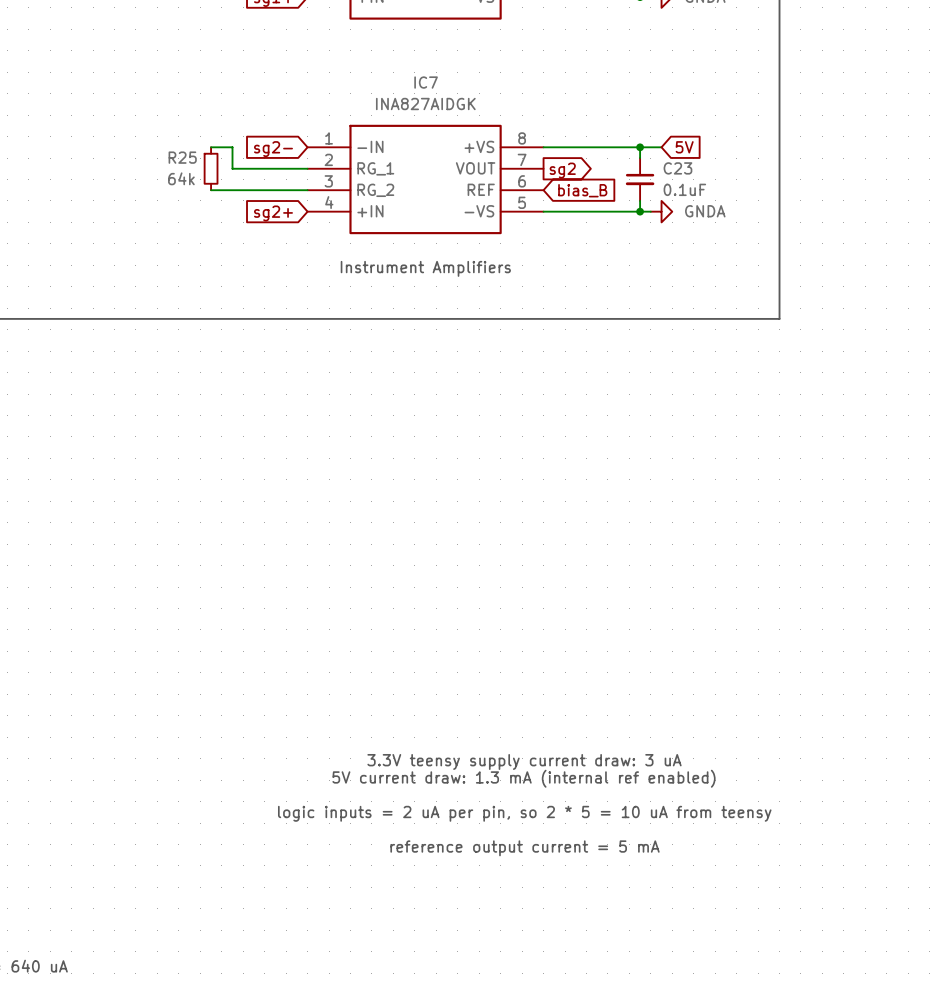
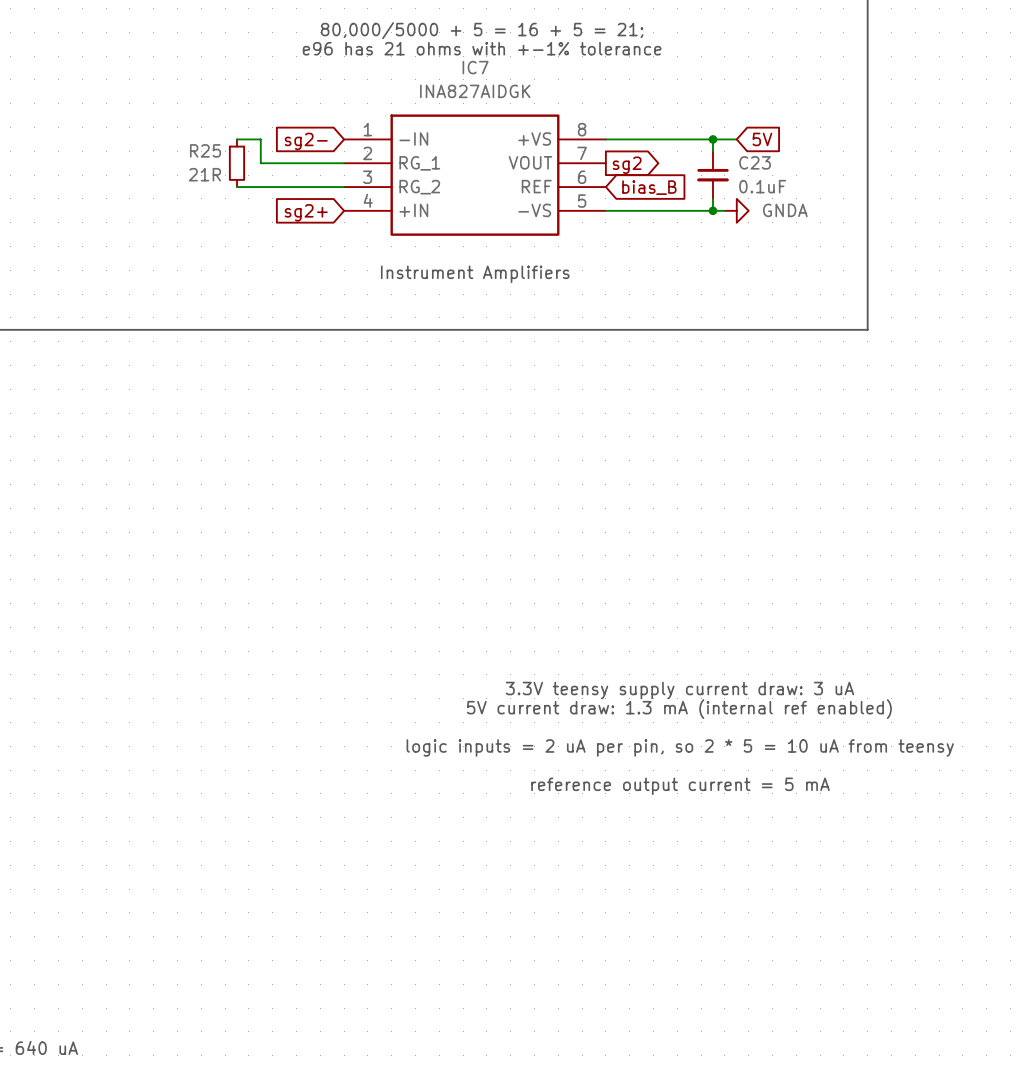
text: none -> 80,000/5000 + 5 = 16 + 5 = 21; (482, 30)
text: none -> e96 has 21 ohms with +-1% tolerance (482, 48)
R25 value: 64k (181, 178) -> 21R (204, 174)
text position: 3.3V teensy supply current draw: 3 uA (524, 761) -> 3.3V teensy supply current draw: 3 uA (679, 690)
text position: 5V current draw: 1.3 mA (internal ref enabled) (523, 778) -> 5V current draw: 1.3 mA (internal ref enabled) (679, 709)
text position: logic inputs = 2 uA per pin, so 2 * 5 = 10 uA from teensy (524, 813) -> logic inputs = 2 uA per pin, so 2 * 5 = 10 uA from teensy (680, 747)
text position: reference output current = 5 mA (525, 848) -> reference output current = 5 mA (680, 786)

